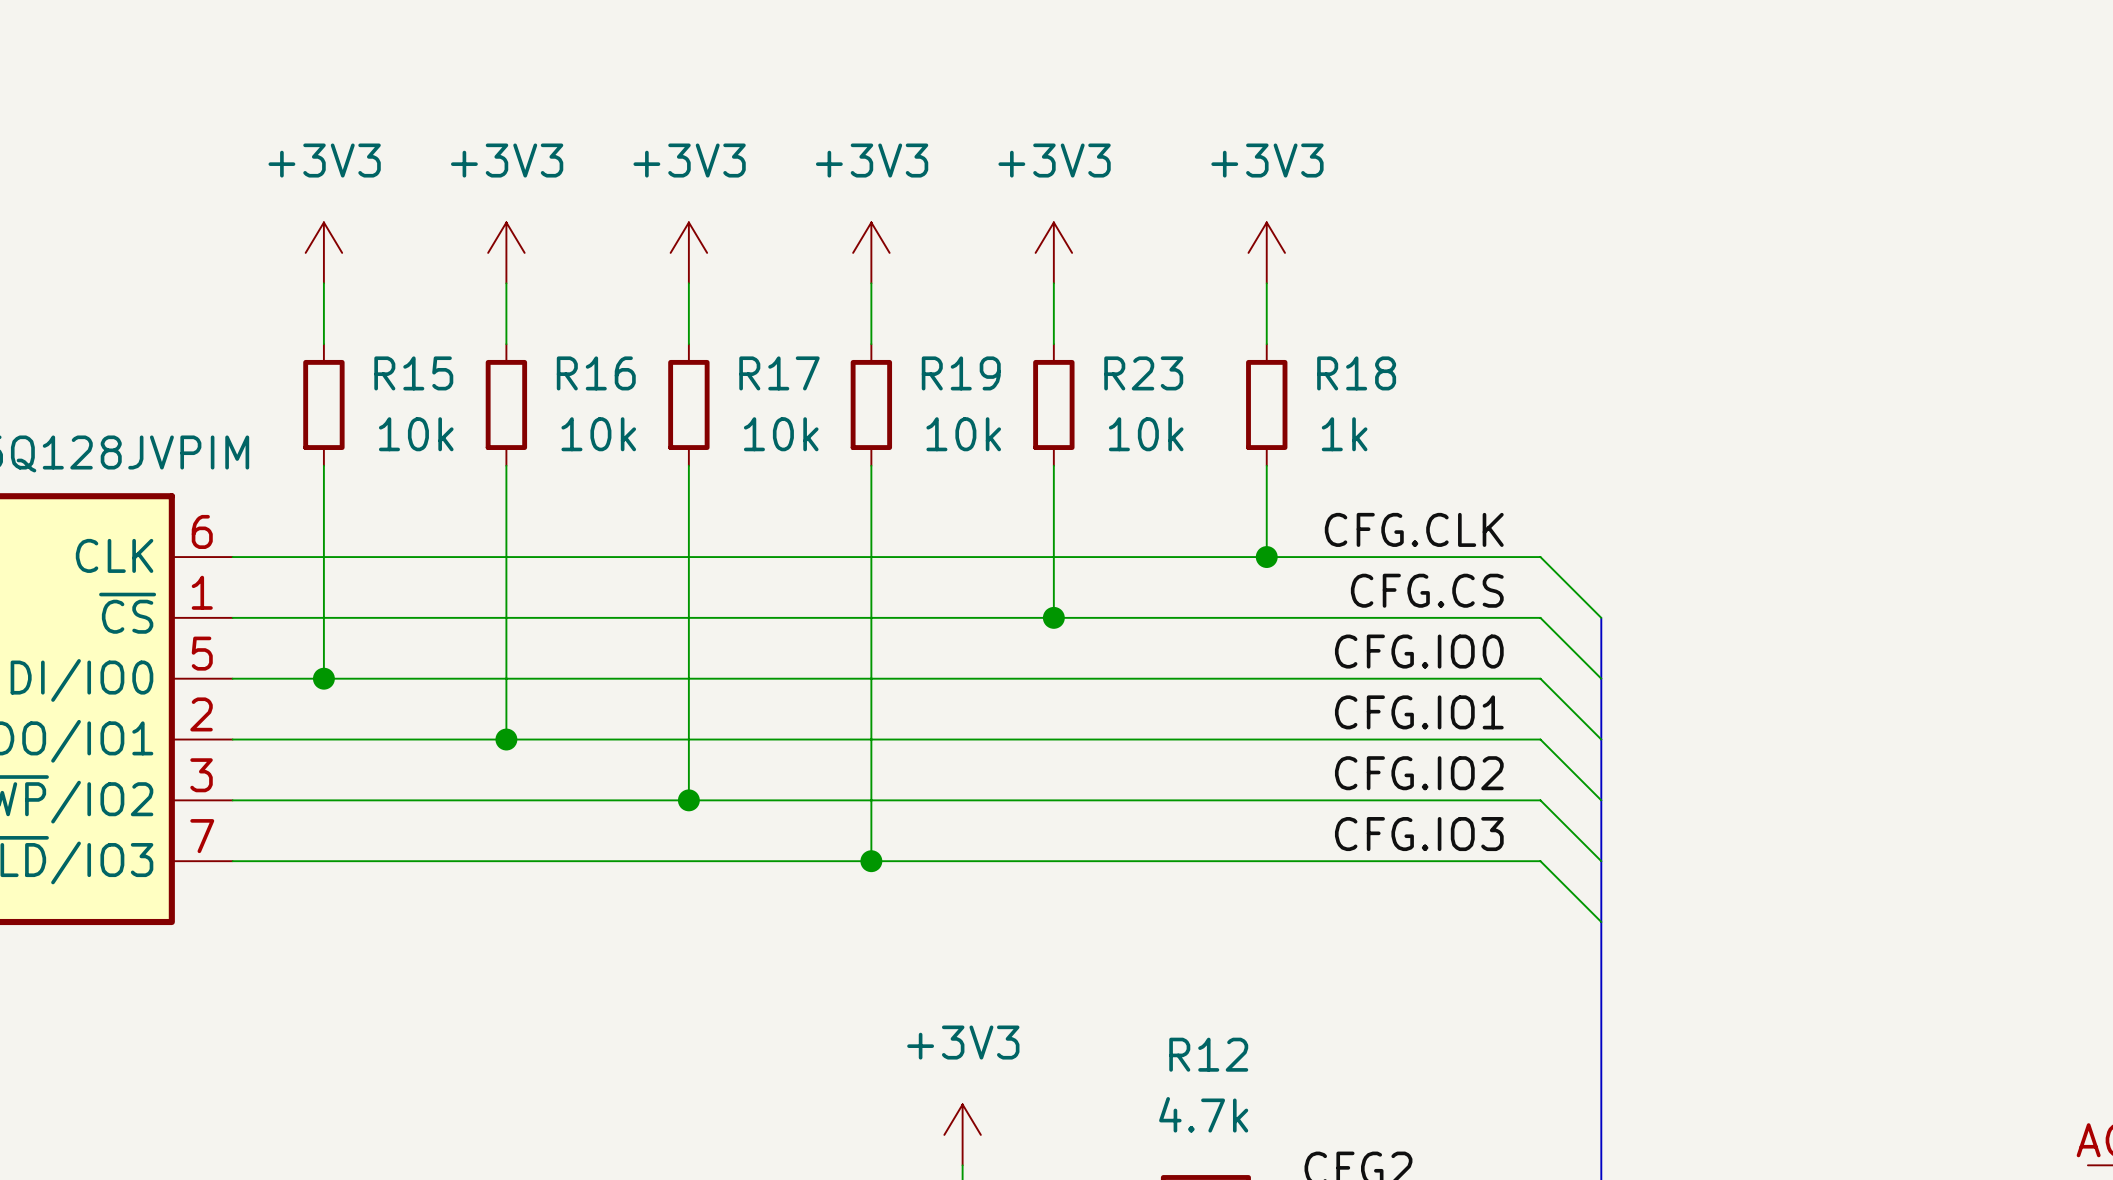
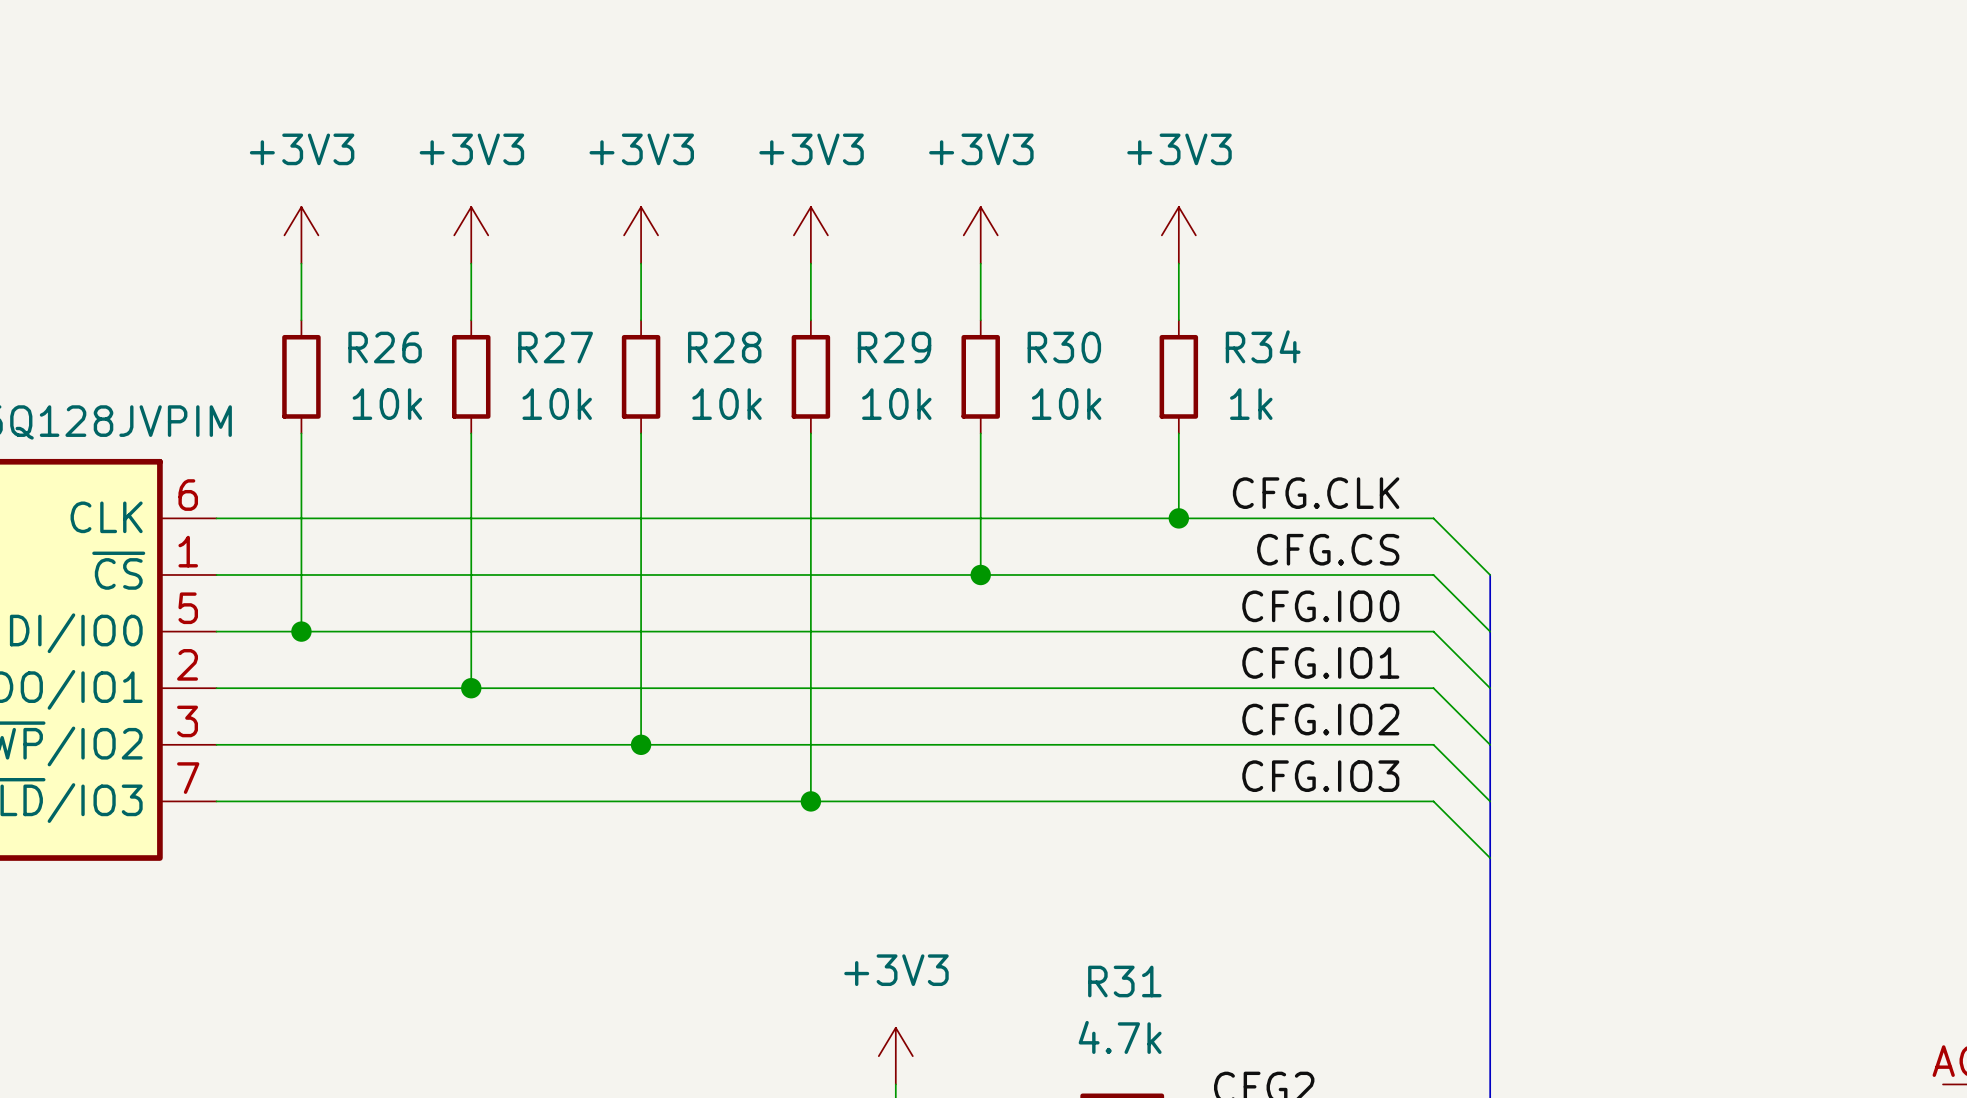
R15 name: R15 (413, 373) -> R26 (385, 347)
R16 name: R16 (596, 373) -> R27 (555, 347)
R17 name: R17 (779, 373) -> R28 (724, 347)
R19 name: R19 (961, 373) -> R29 (894, 347)
R23 name: R23 (1143, 373) -> R30 (1064, 347)
R18 name: R18 (1356, 373) -> R34 (1263, 346)
R12 name: R12 (1208, 1054) -> R31 (1124, 981)

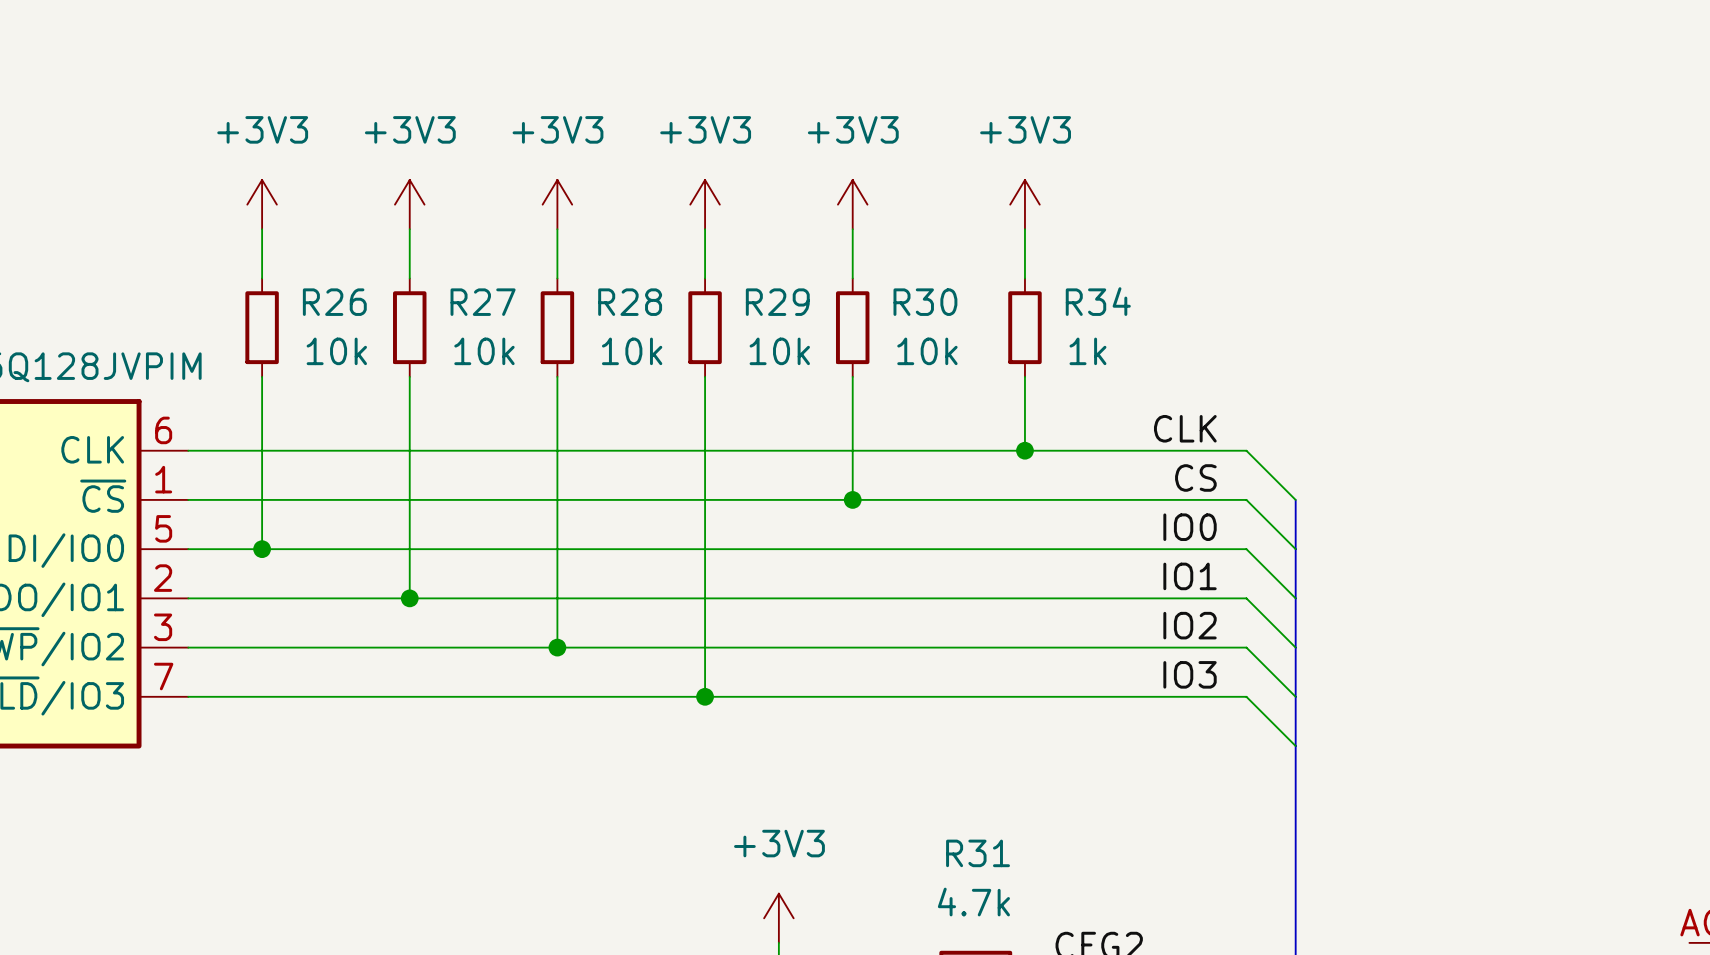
label: CFG.CLK (1316, 493) -> CLK (1185, 428)
label: CFG.CS (1328, 549) -> CS (1195, 477)
label: CFG.IO0 (1320, 606) -> IO0 (1190, 527)
label: CFG.IO1 (1320, 662) -> IO1 (1190, 576)
label: CFG.IO2 (1320, 719) -> IO2 (1190, 625)
label: CFG.IO3 (1320, 776) -> IO3 (1190, 674)

